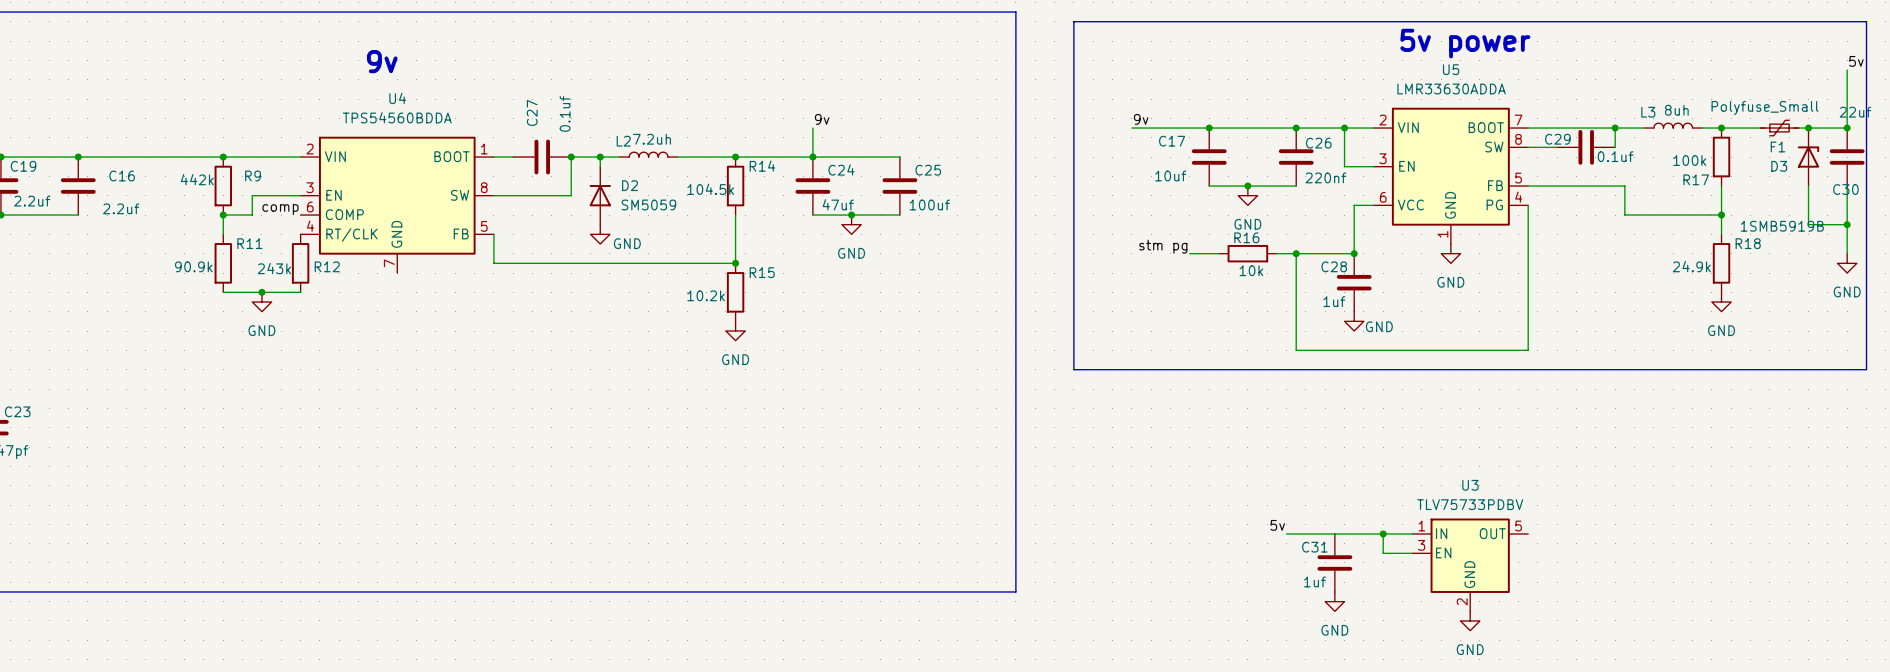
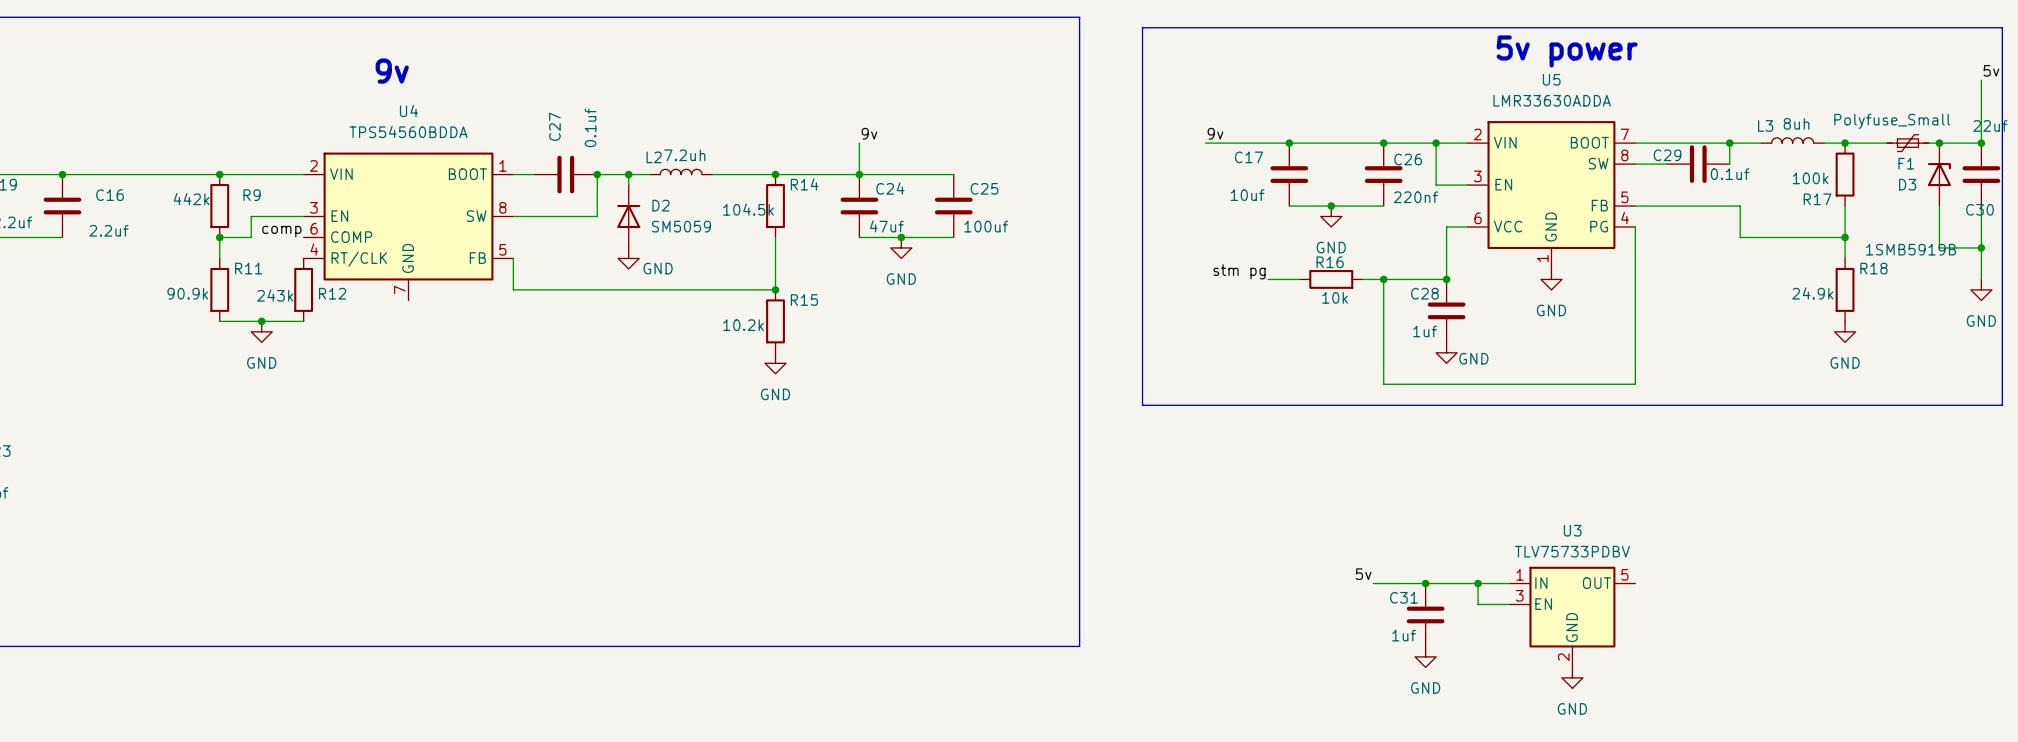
junction: none -> (1425, 583)

